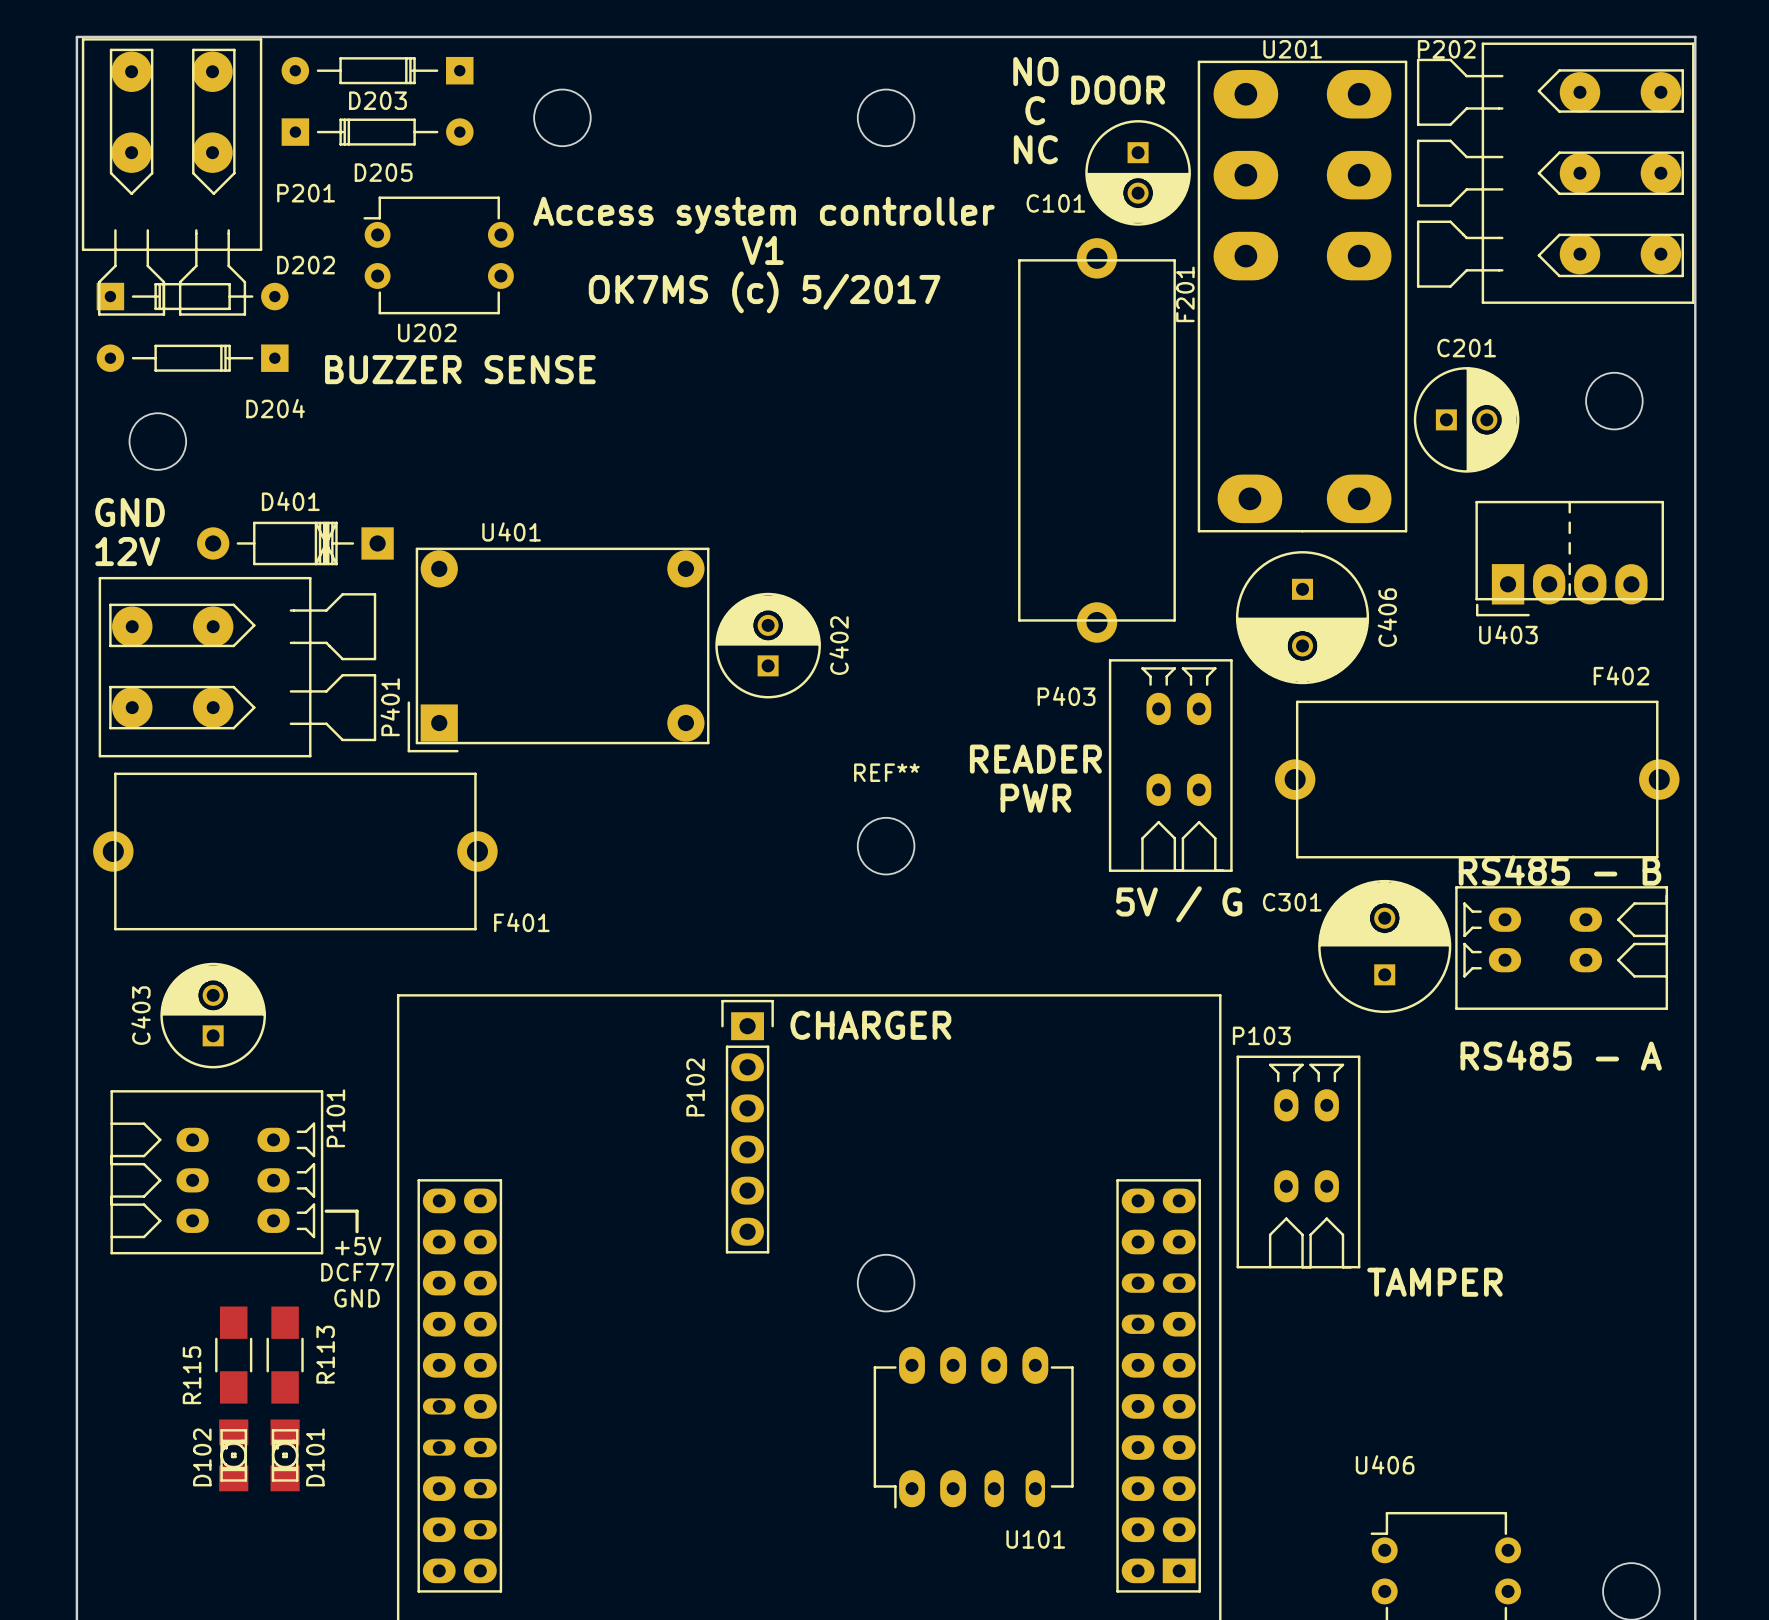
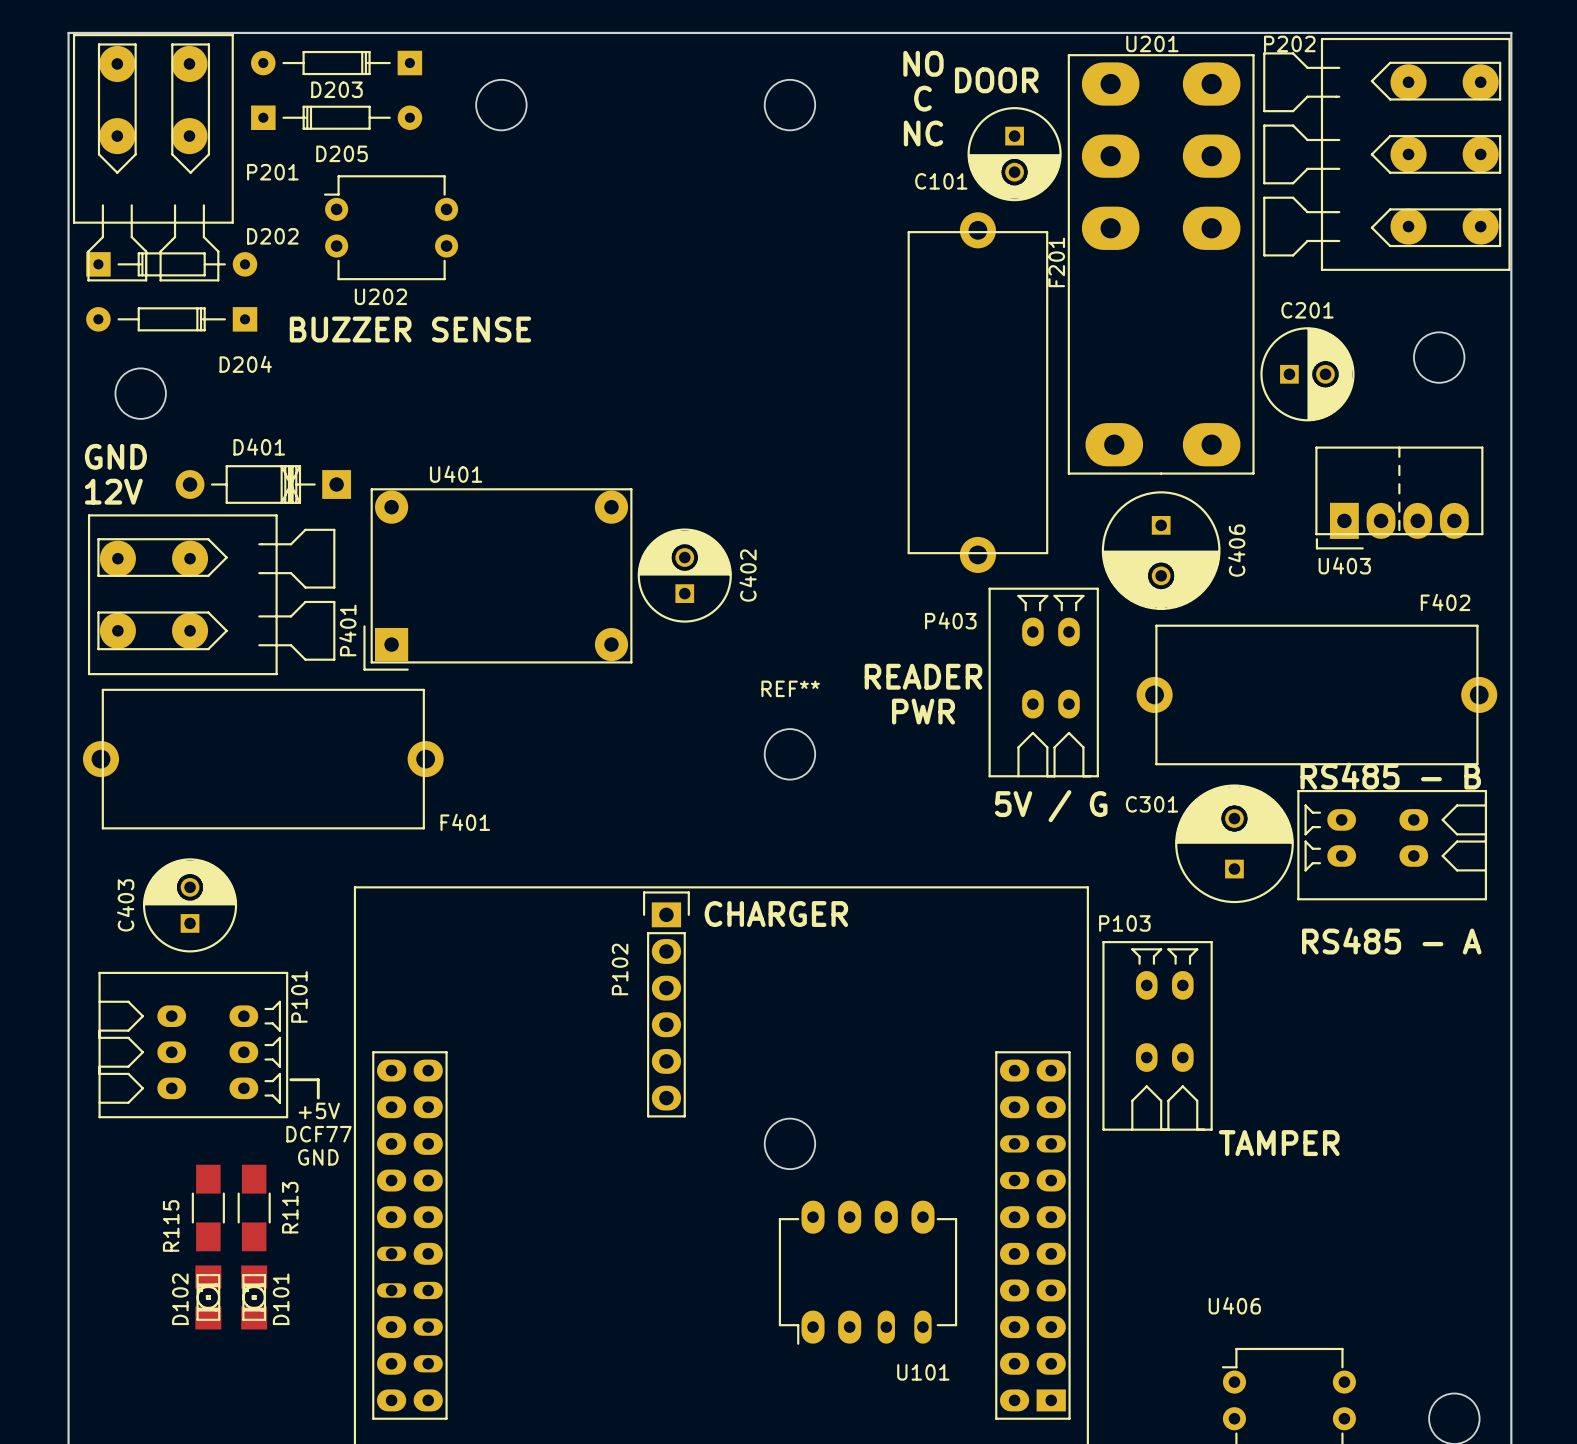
text: Access system controller (764, 215) -> none
text: V1 (762, 250) -> none
text: OK7MS (c) 5/2017 (764, 292) -> none

